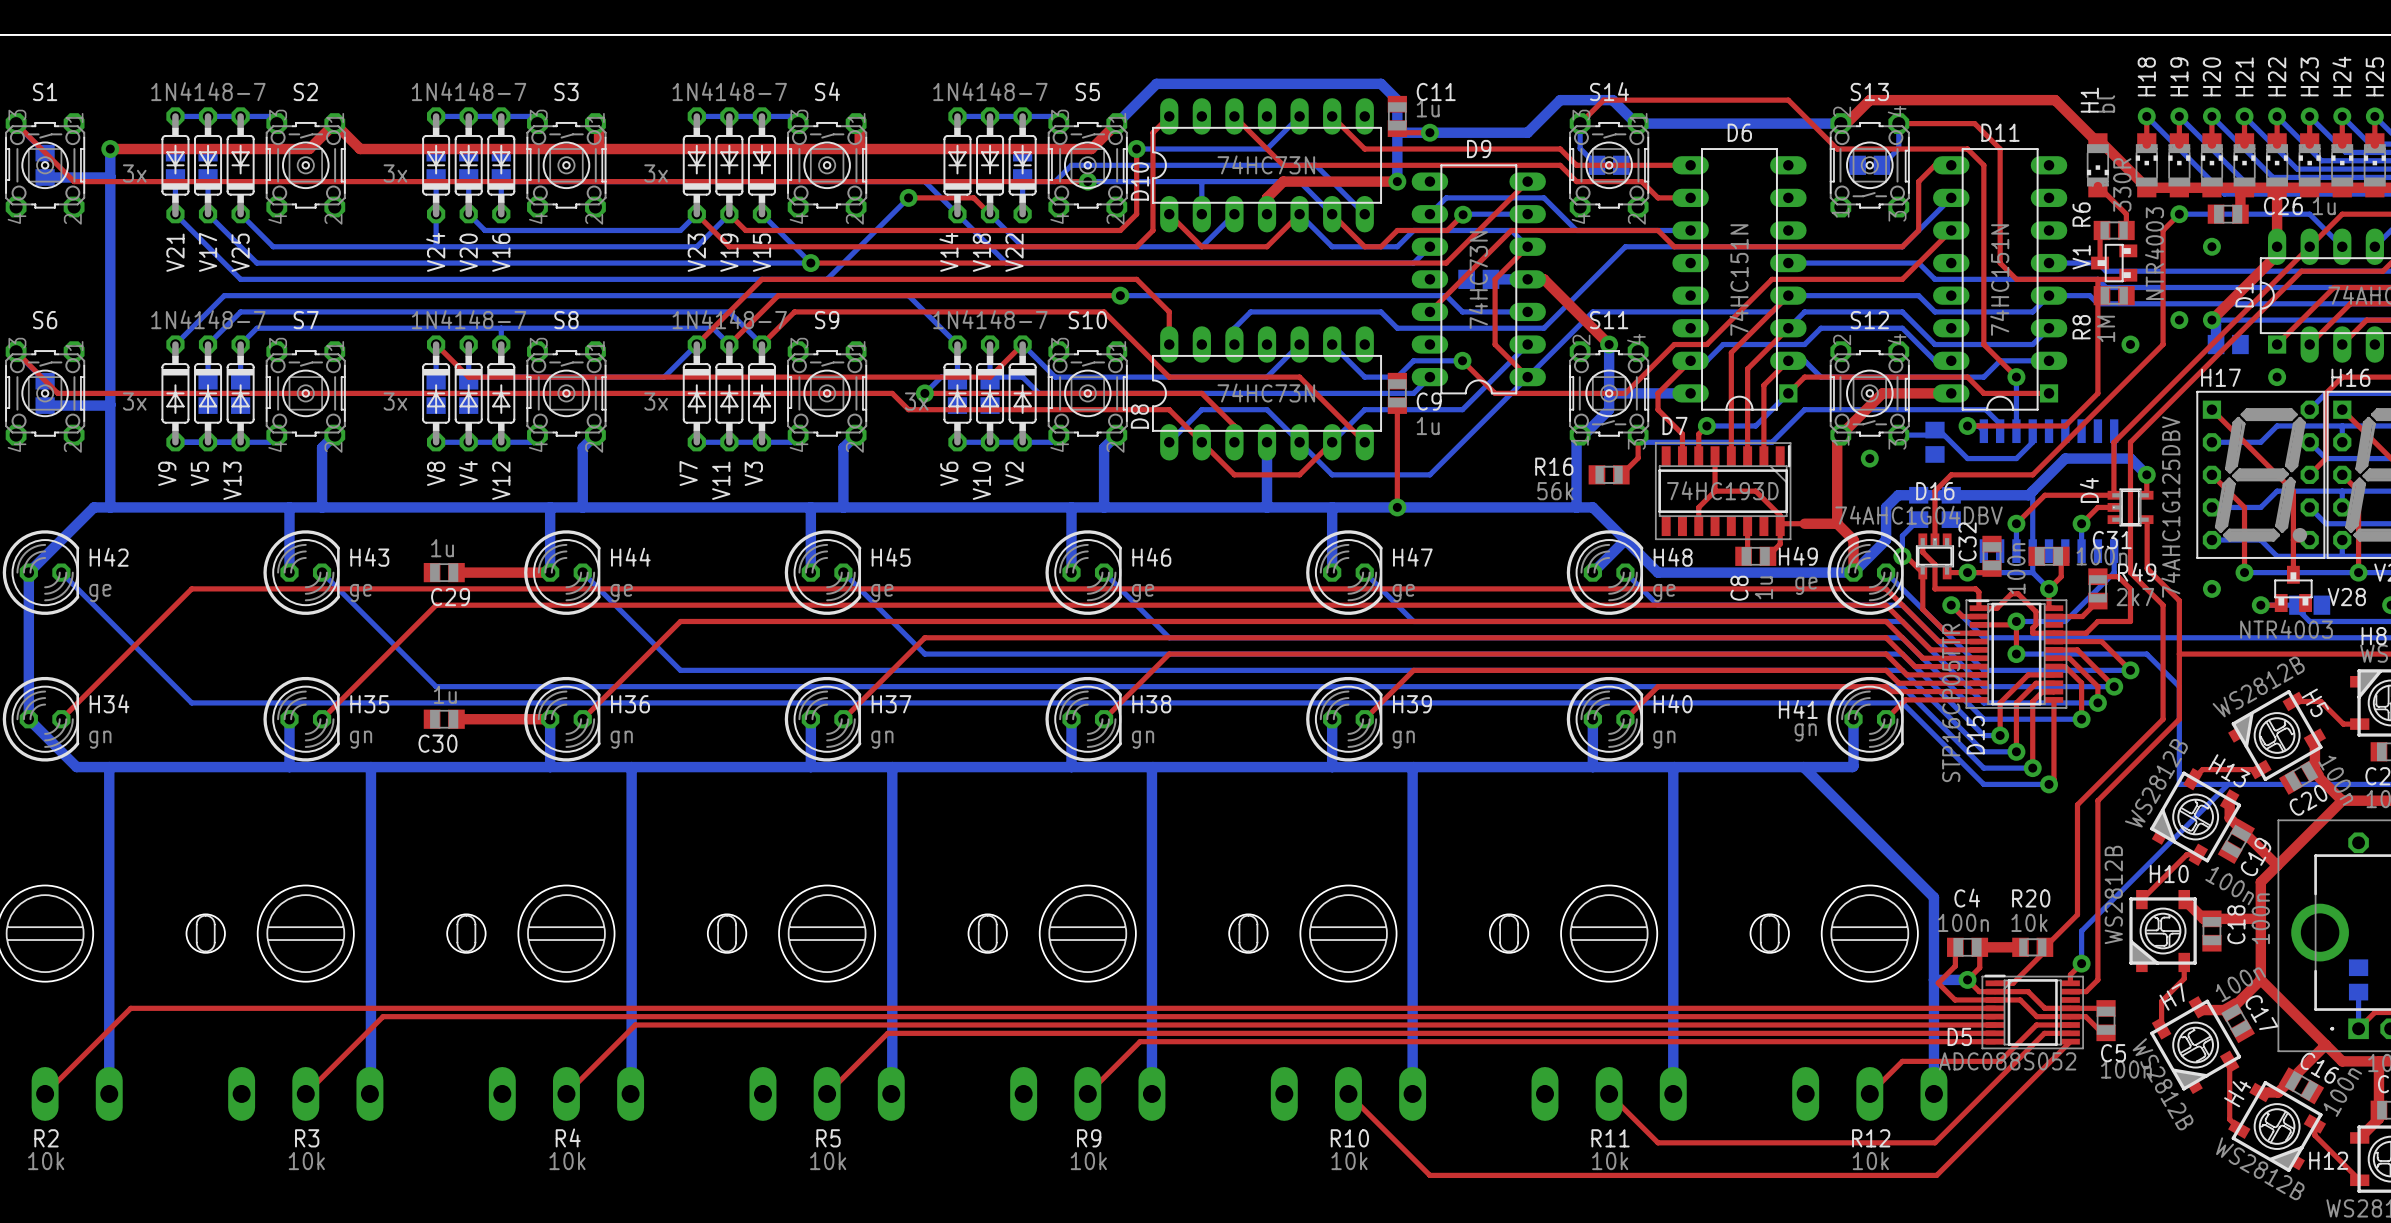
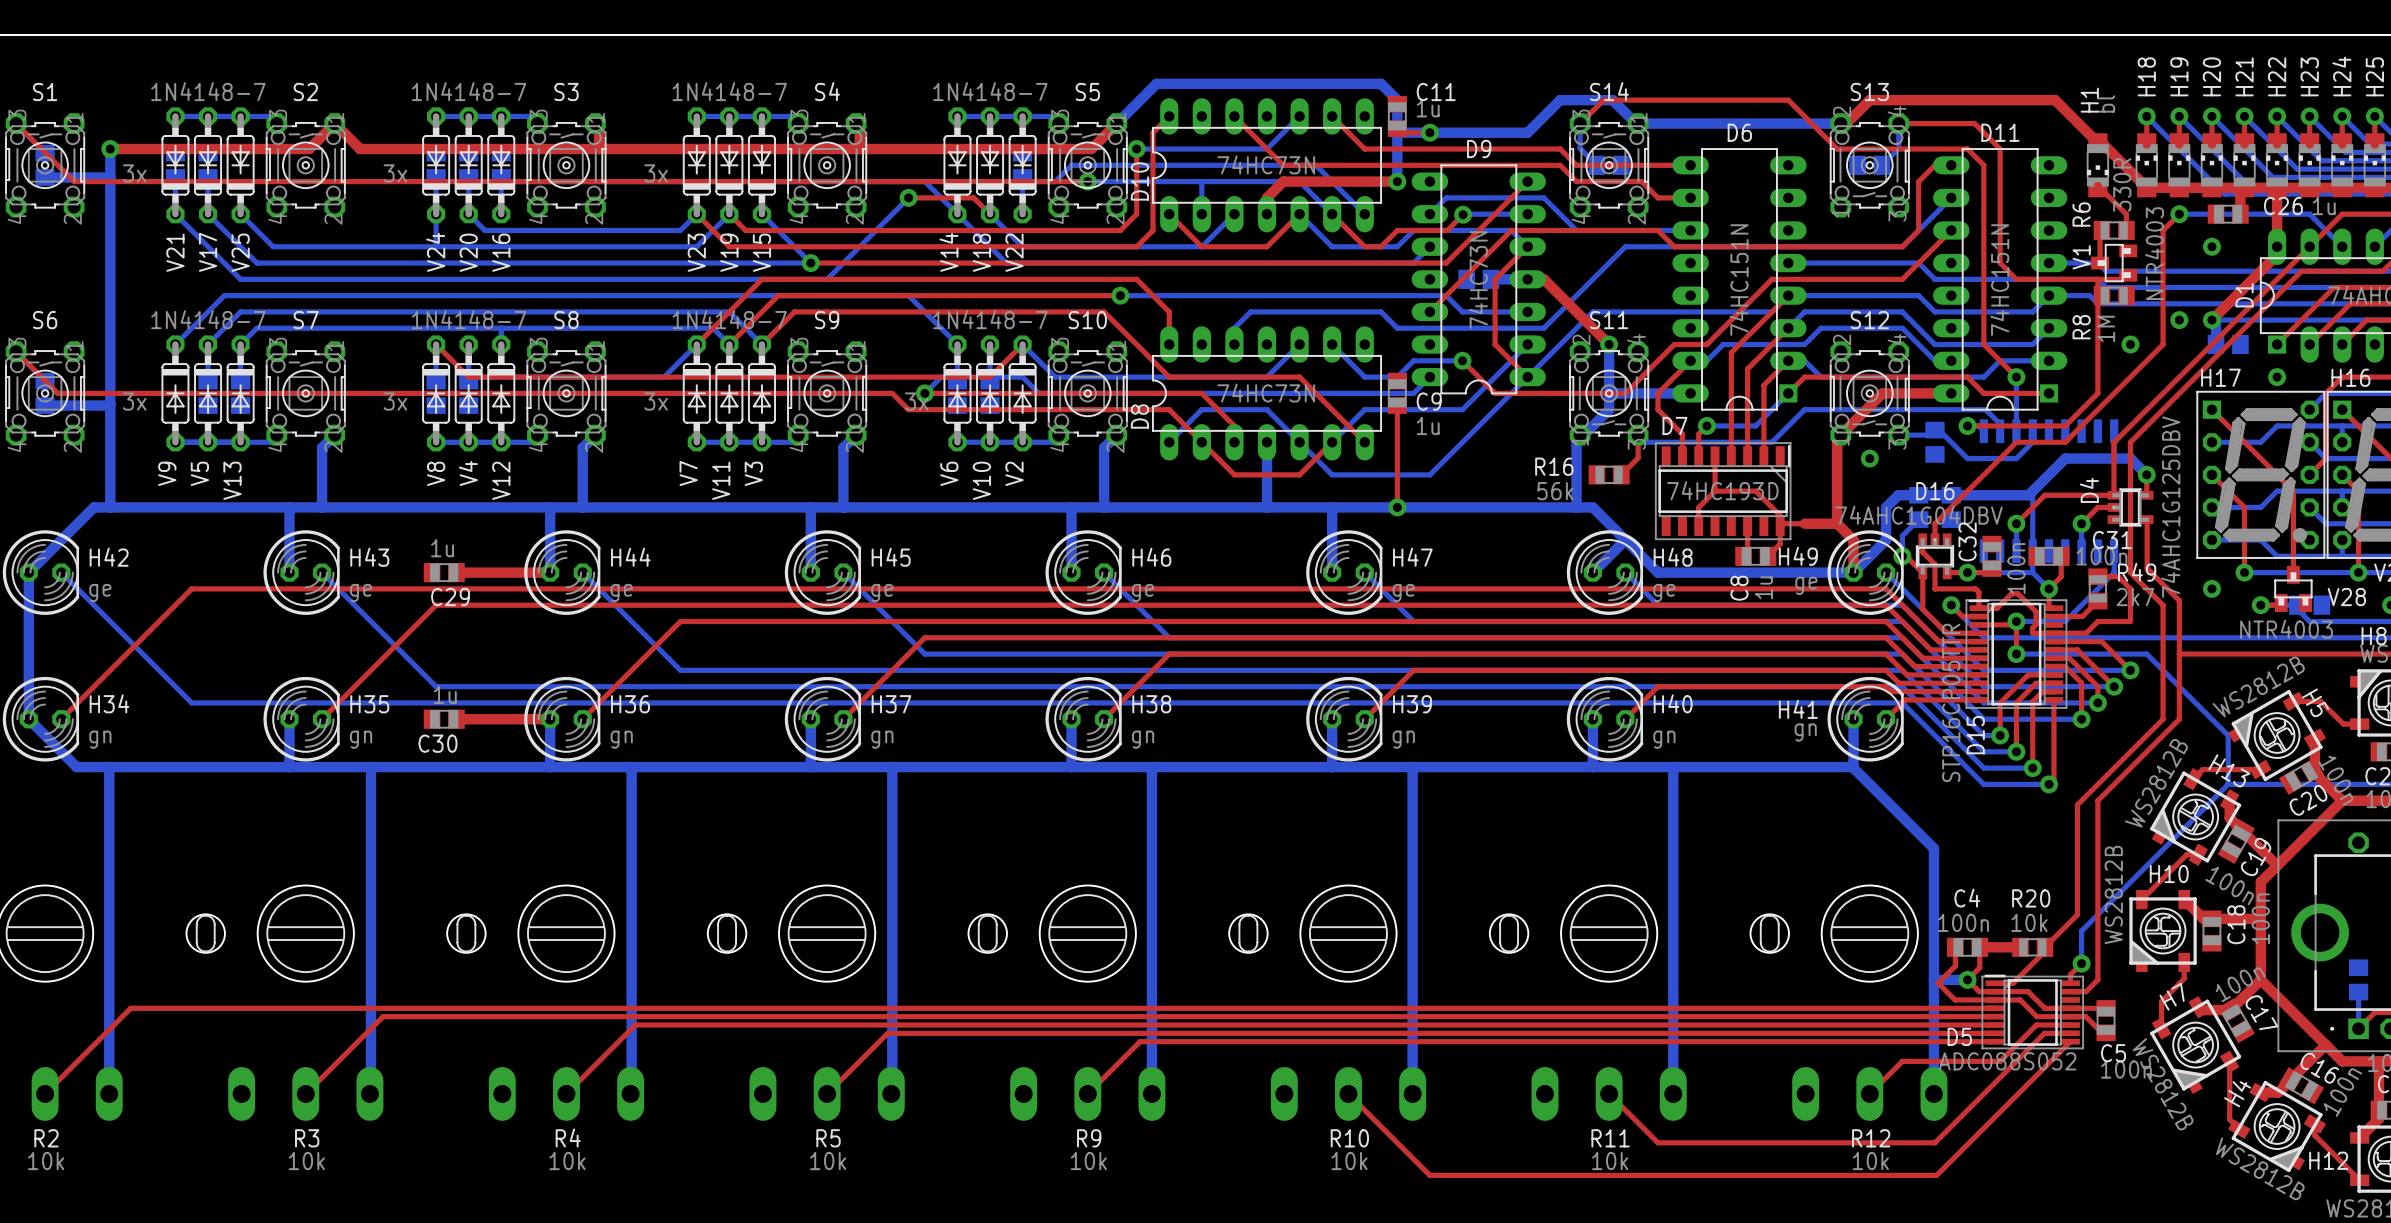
top track: (2065, 442) (2032, 474) (1951, 474) (1934, 491) (1934, 523) -> (2065, 442) (2016, 442) (1934, 523)
bottom track: (2179, 686) (2179, 784) (2228, 784) -> (2179, 686) (2228, 735) (2228, 784)
bottom track: (1803, 767) (1933, 897) -> (1852, 767) (1933, 848) (1933, 897)

